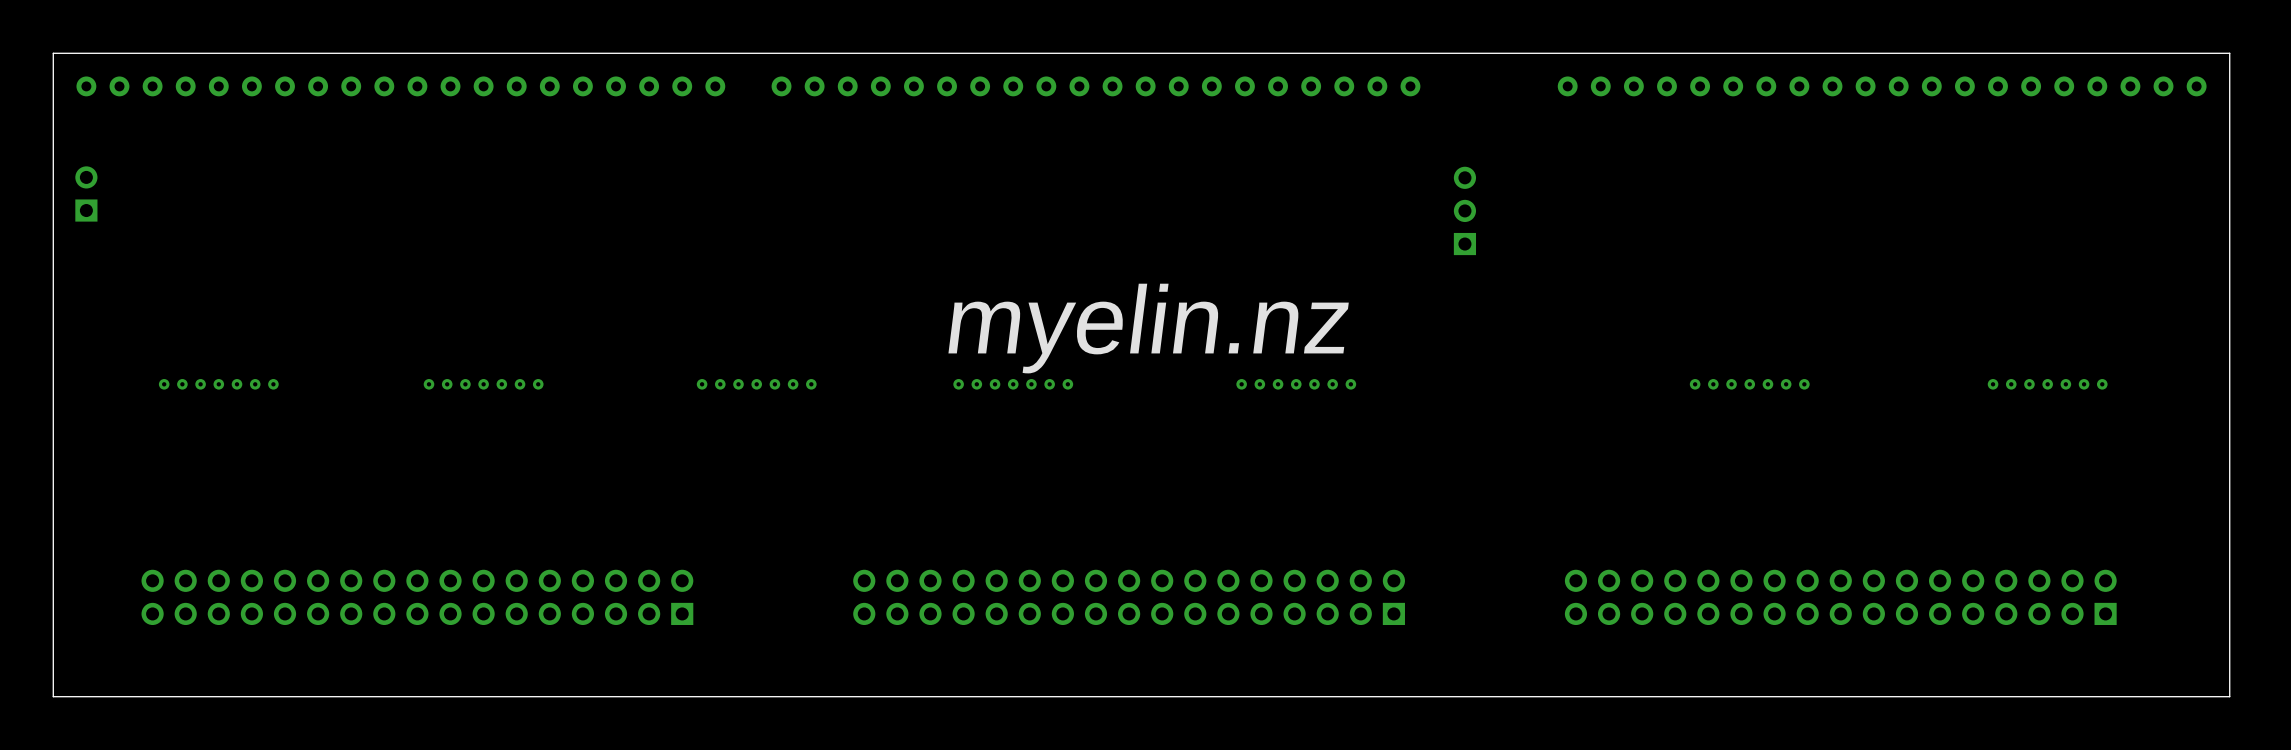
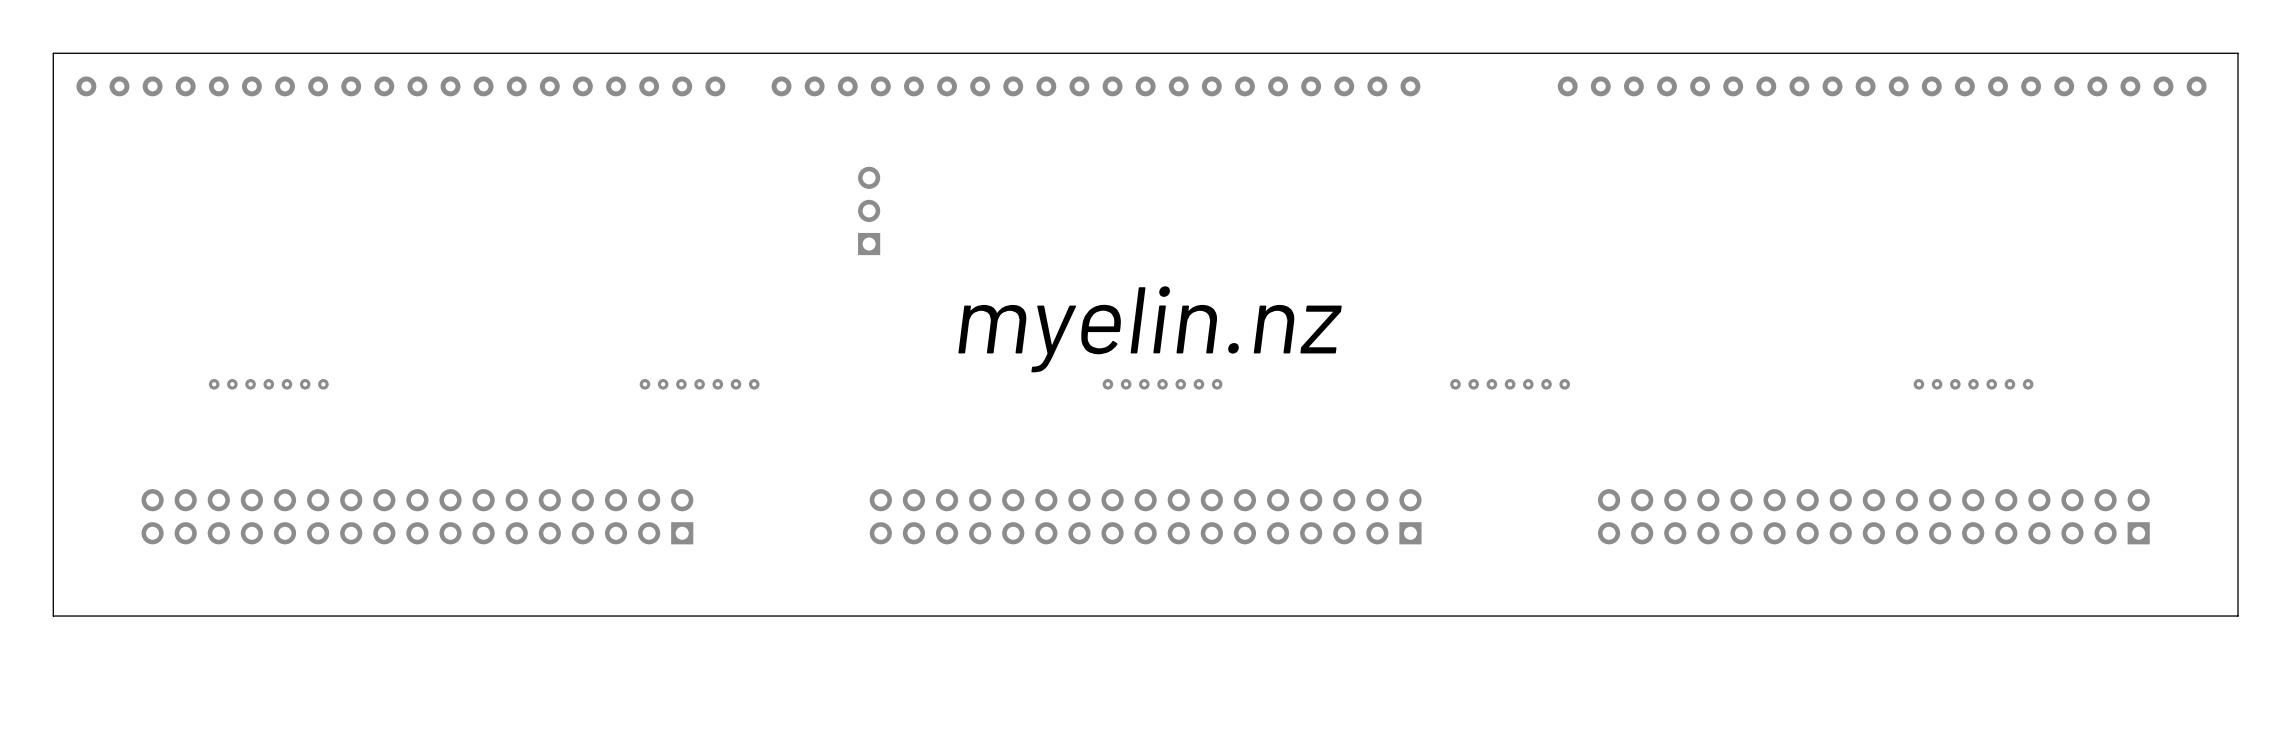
board edge: (2229, 53) (2229, 696) (53, 696) (53, 616) -> (2229, 53) (2237, 53) (2237, 616) (53, 616)
part: (86, 193) -> none
part: none -> (869, 210)
part: (1464, 210) -> none
part position: (218, 384) -> (268, 384)
part: (483, 384) -> none
part position: (756, 384) -> (699, 384)
part: (1013, 384) -> none
part: none -> (1162, 384)
part: (1296, 384) -> none
part: none -> (1510, 384)
part: (1749, 384) -> none
part position: (2047, 384) -> (1973, 384)
part position: (417, 597) -> (417, 516)
part position: (1129, 597) -> (1145, 516)
part position: (1840, 597) -> (1873, 516)

